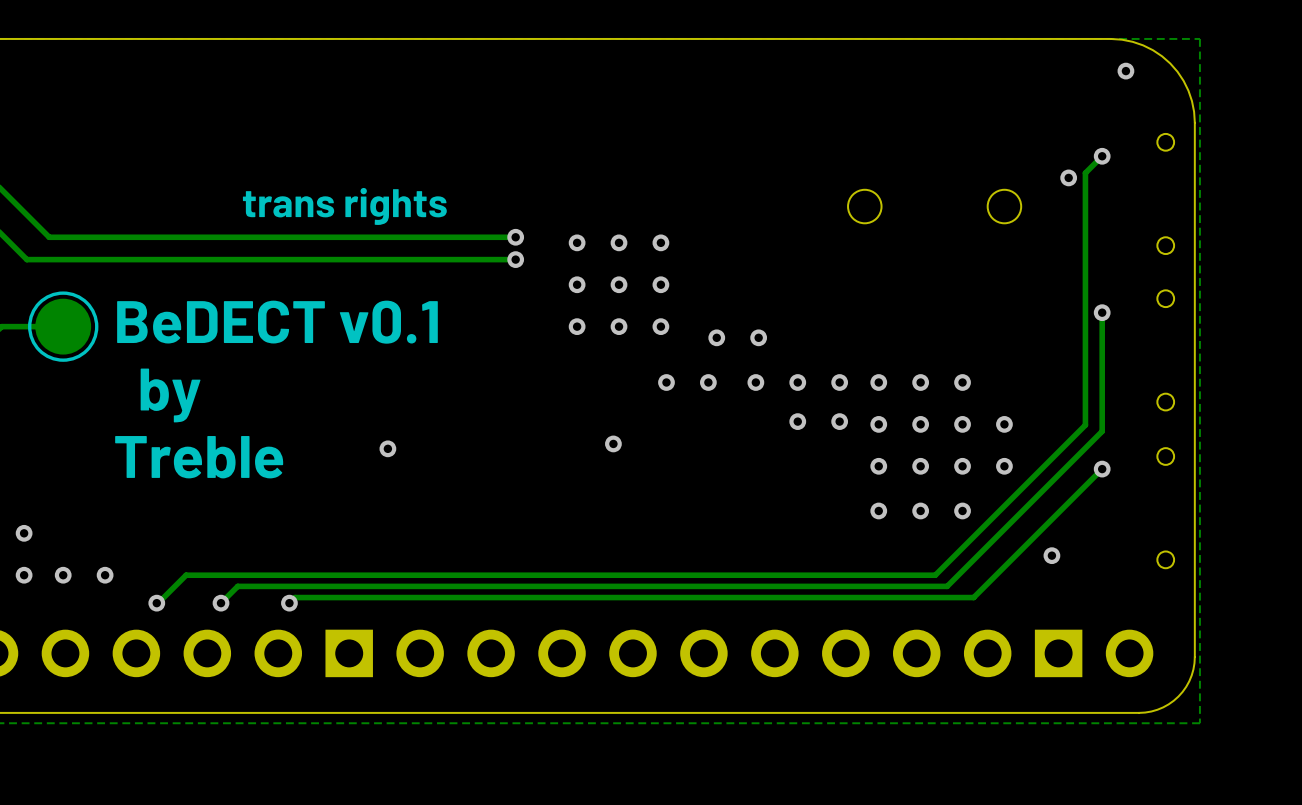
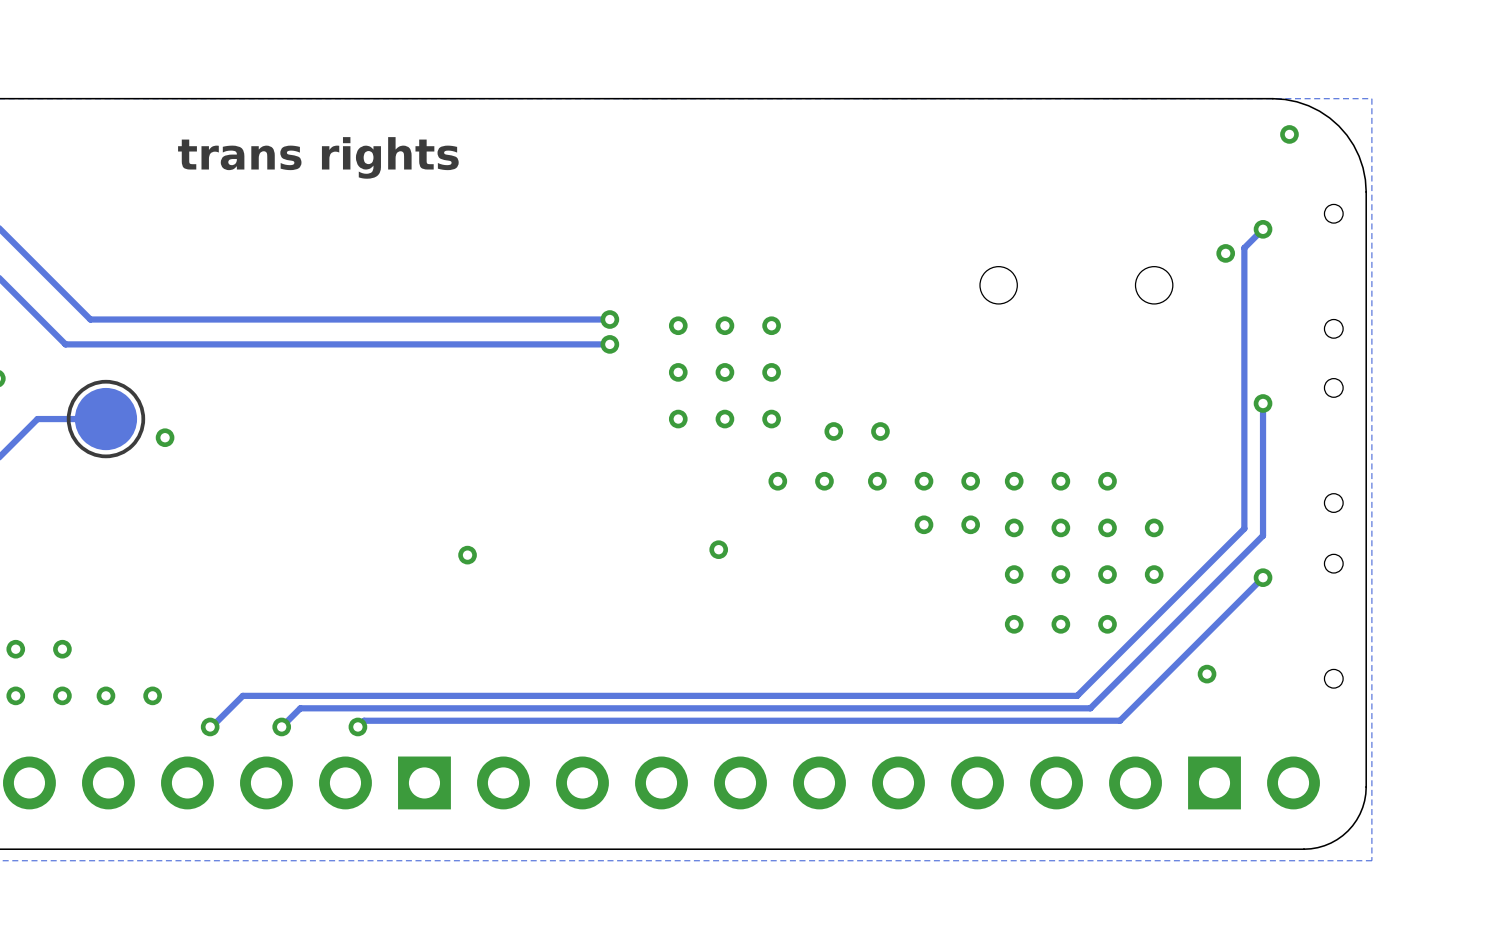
text position: trans rights (344, 206) -> trans rights (318, 157)
text: BeDECT v0.1 (277, 322) -> none
via: none -> (165, 437)
text: by (170, 395) -> none
text: Treble (199, 457) -> none

